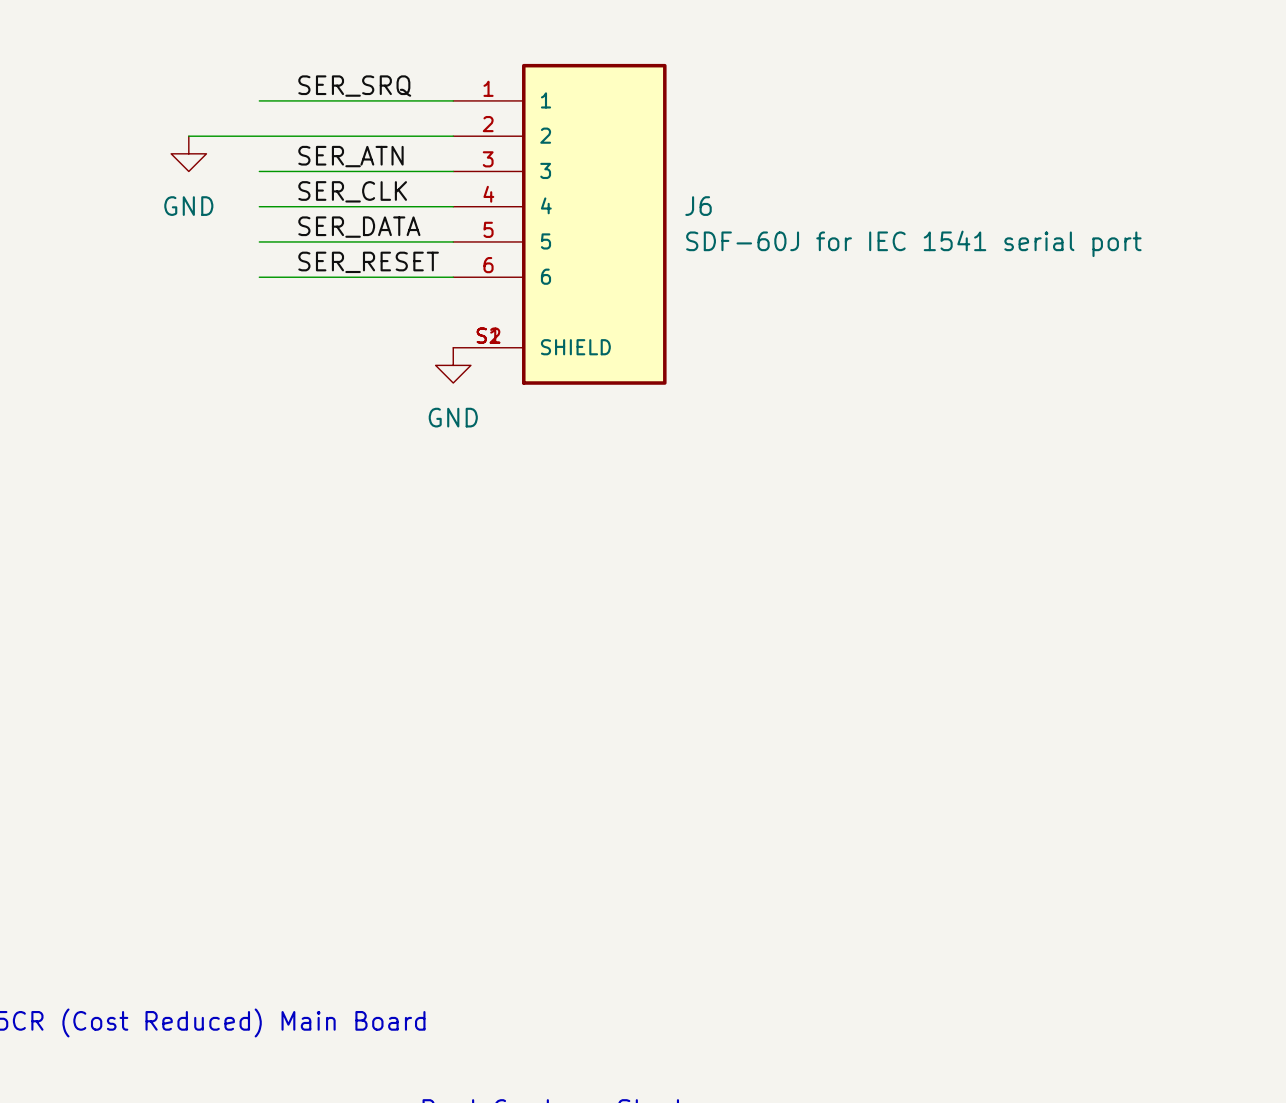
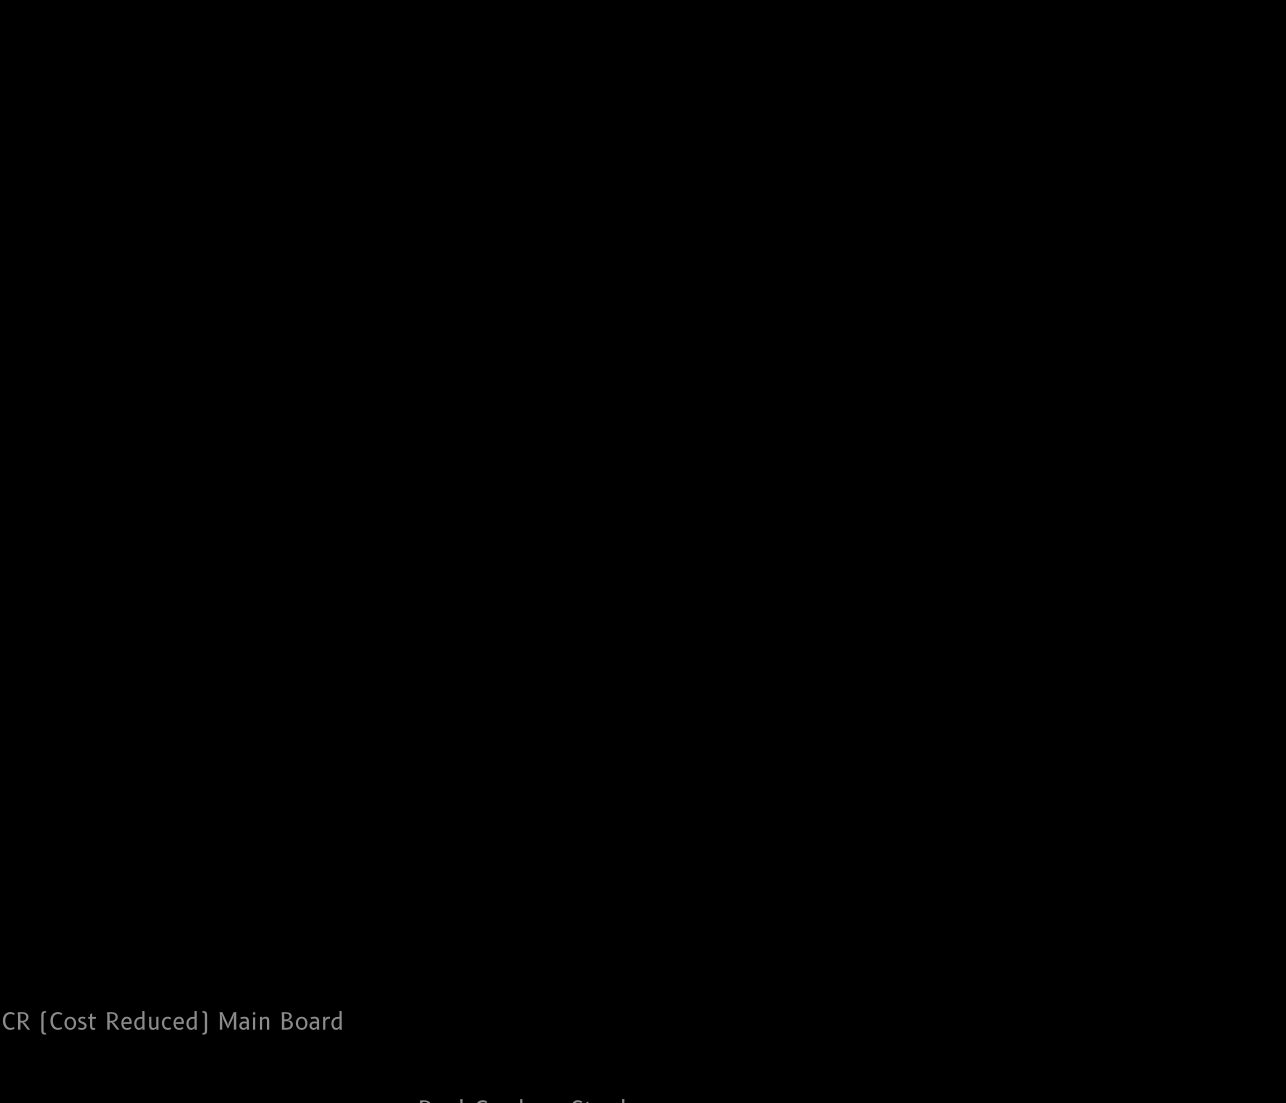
label: SER_SRQ (354, 86) -> none
wire: (259, 100) (453, 100) -> none
wire: (188, 136) (453, 136) -> none
power symbol: GND (188, 153) -> none
label: SER_ATN (350, 156) -> none
wire: (259, 171) (453, 171) -> none
label: SER_CLK (352, 191) -> none
wire: (259, 206) (453, 206) -> none
J6: SDF-60J for IEC 1541 serial port (559, 224) -> none
label: SER_DATA (359, 227) -> none
wire: (259, 241) (453, 241) -> none
label: SER_RESET (368, 262) -> none
wire: (259, 277) (453, 277) -> none
power symbol: GND (453, 365) -> none

